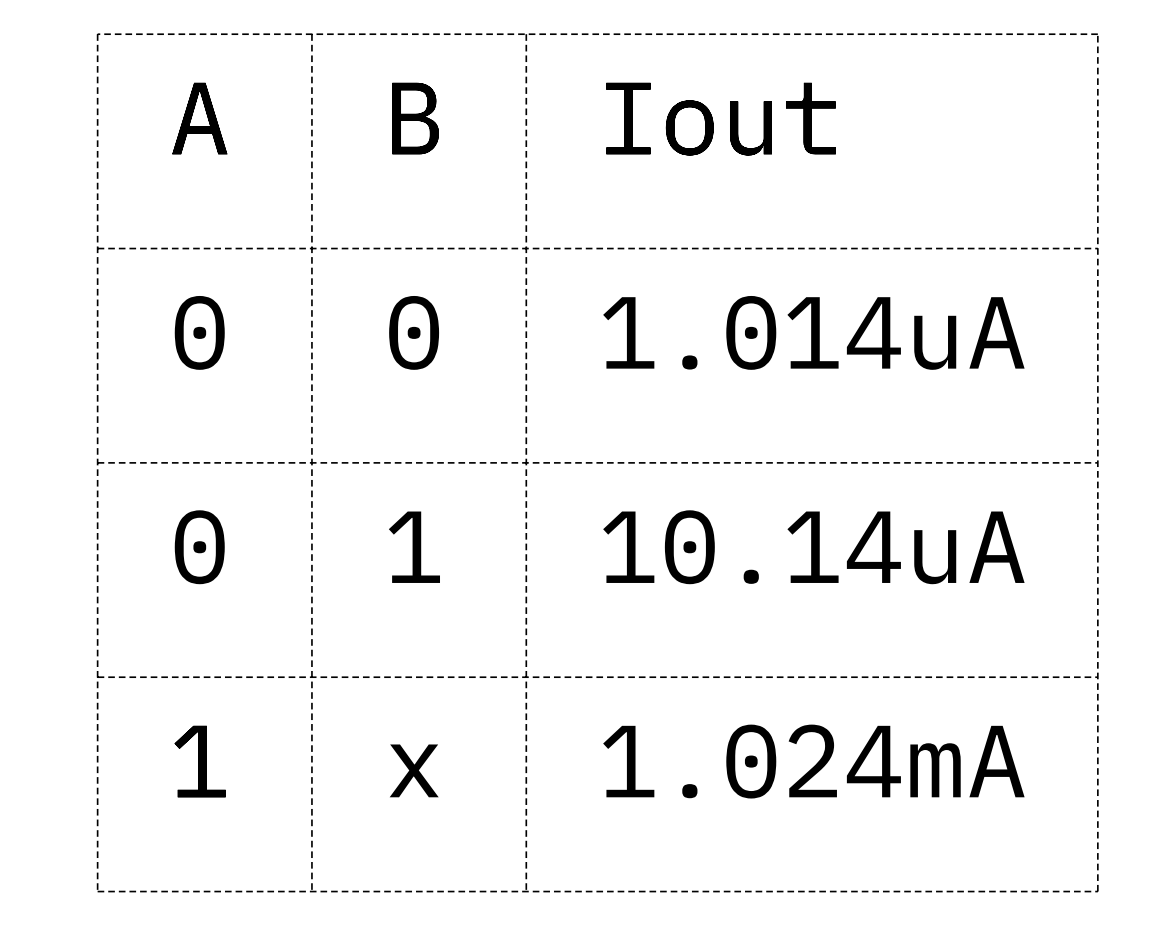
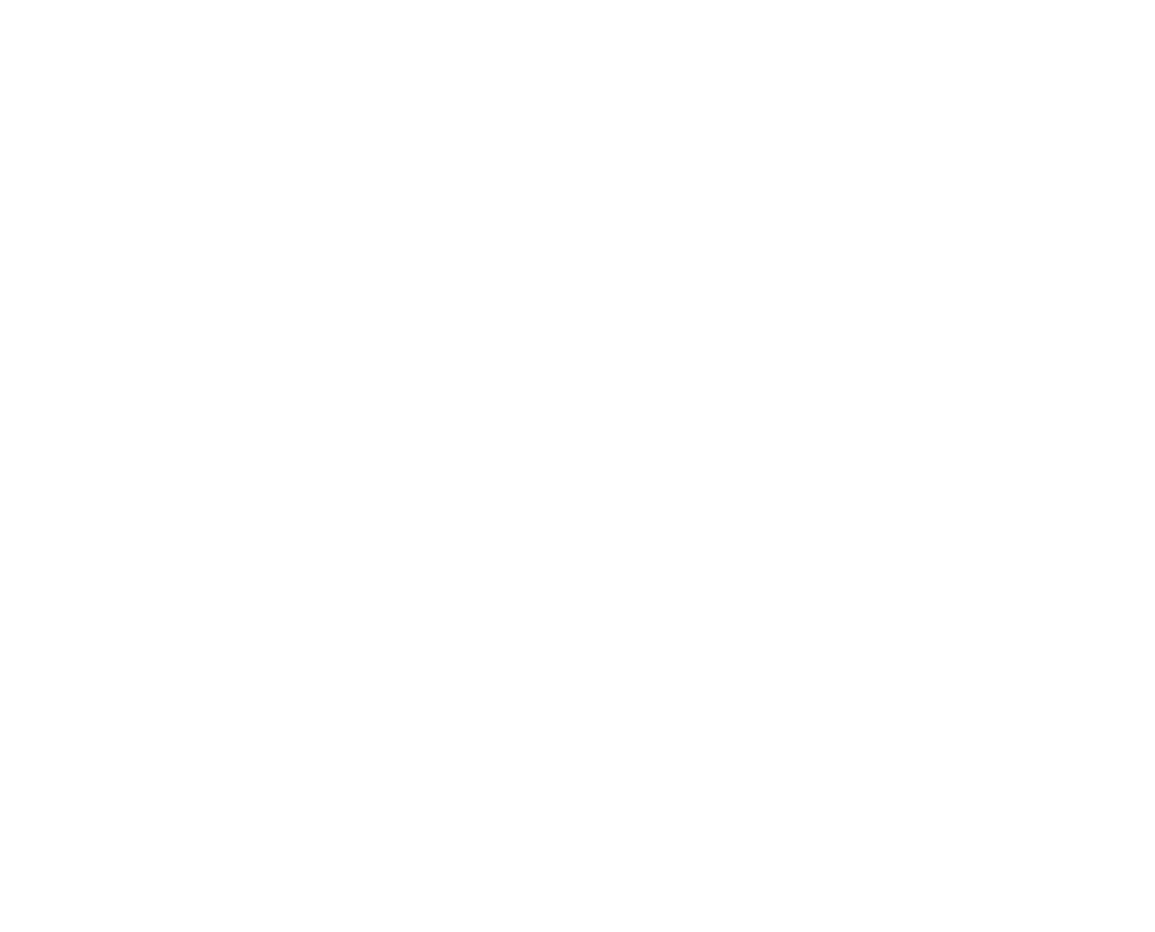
line: (97, 34) (97, 891) (1097, 891) (1097, 34) (97, 34) -> none
line: (311, 34) (311, 891) -> none
line: (526, 34) (526, 891) -> none
text: A (199, 118) -> none
text: B (415, 118) -> none
text: Iout (721, 119) -> none
line: (97, 248) (1097, 248) -> none
text: 0 (199, 332) -> none
text: 0 (414, 332) -> none
text: 1.014uA (813, 332) -> none
line: (97, 462) (1097, 462) -> none
text: 0 (199, 547) -> none
text: 1 (414, 547) -> none
text: 10.14uA (813, 547) -> none
line: (97, 677) (1097, 677) -> none
text: 1 (200, 761) -> none
text: 1.024mA (813, 761) -> none
text: x (414, 770) -> none

